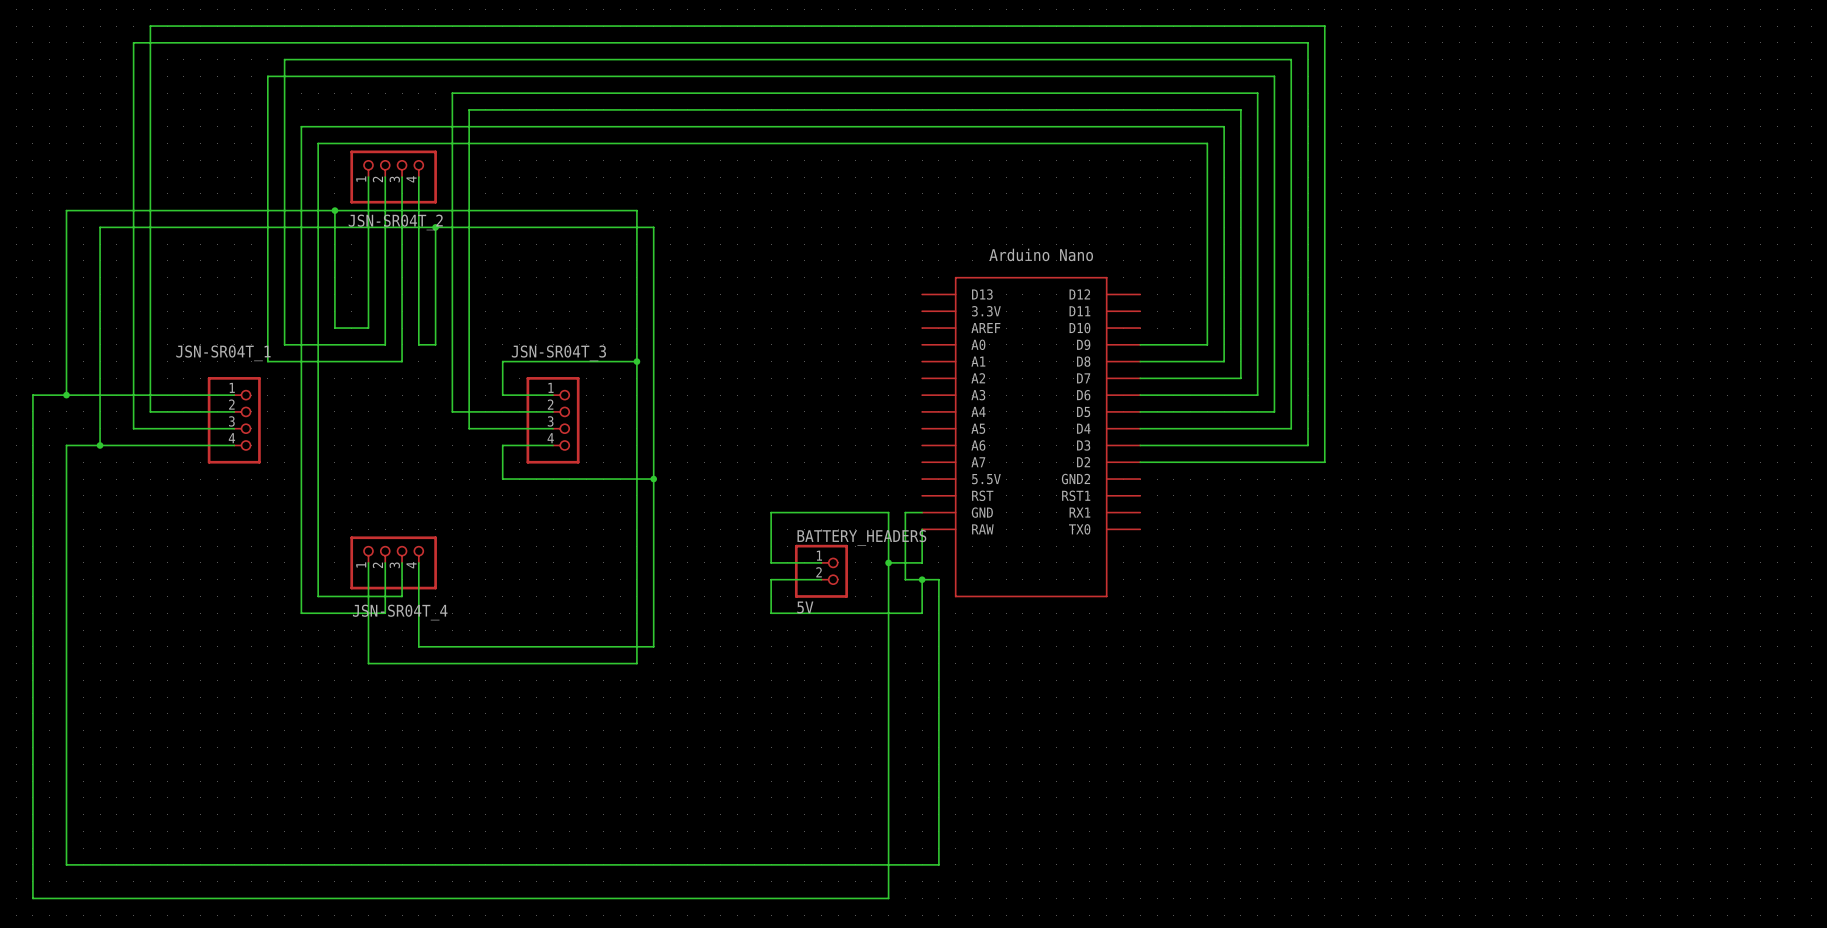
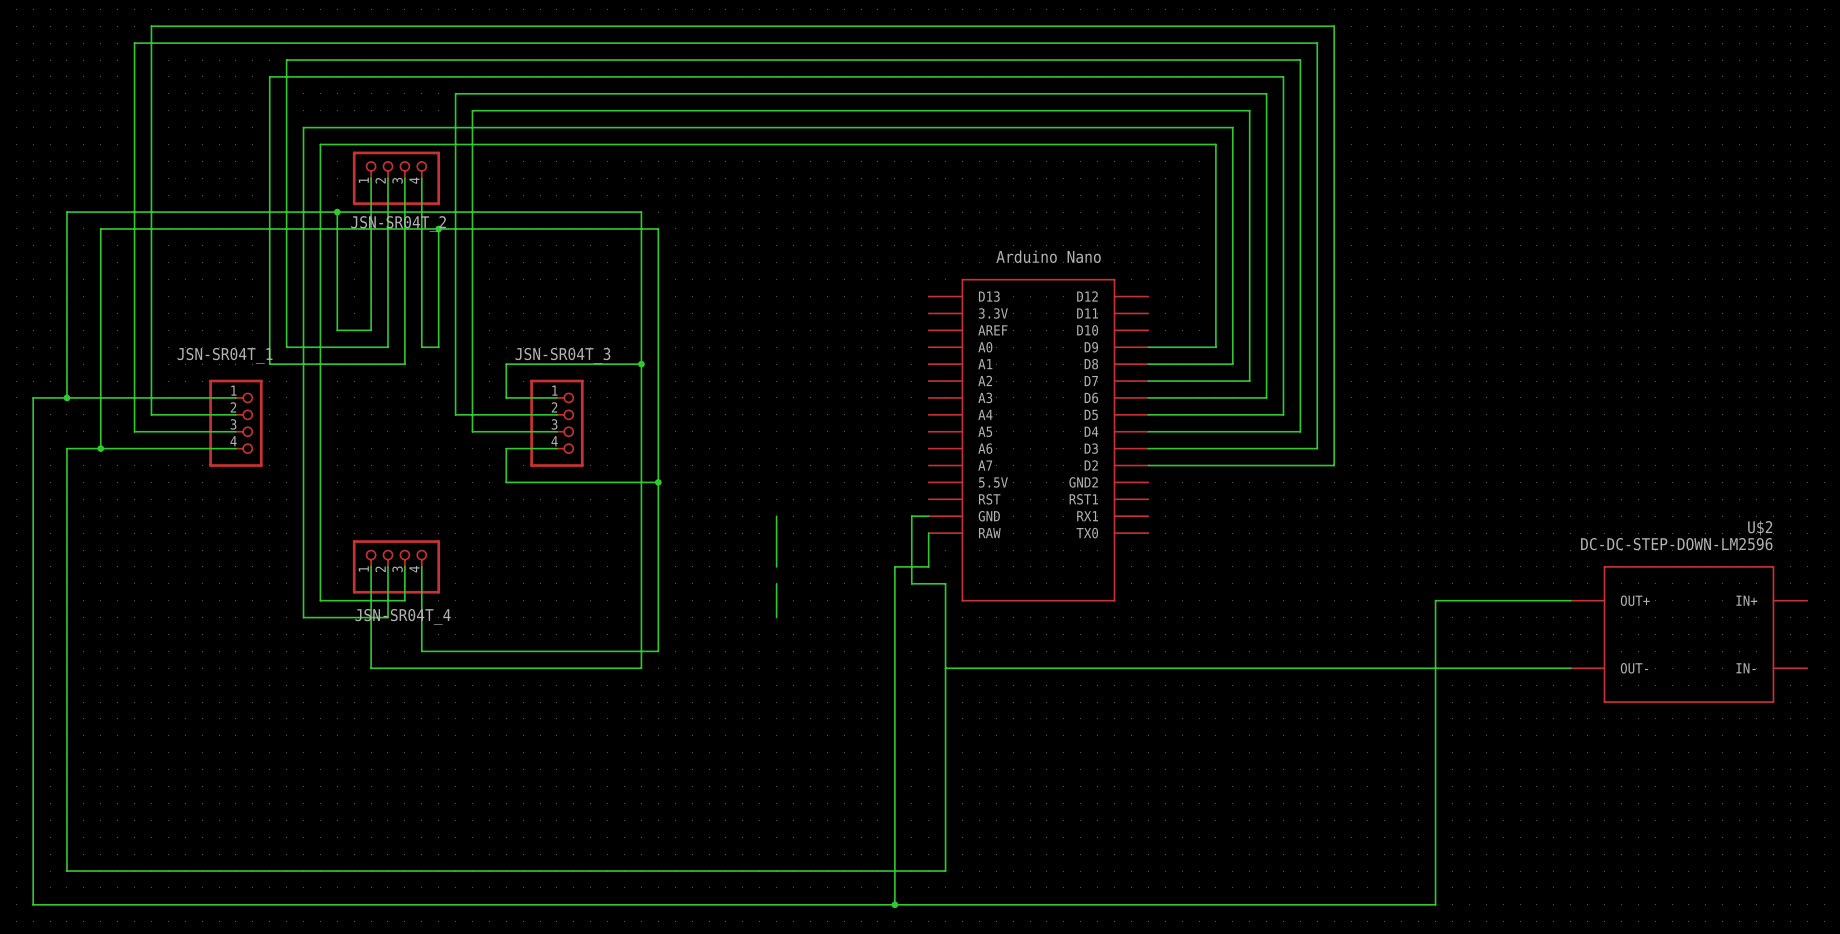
wire: (771, 512) (888, 512) (888, 562) -> none
wire: (771, 562) (821, 562) -> none
junction: (888, 562) -> none
BATTERY_HEADERS: 5V (821, 571) -> none
wire: (771, 579) (821, 579) -> none
wire: (922, 579) (922, 613) (771, 613) -> none
junction: (922, 579) -> none
wire: none -> (1570, 600) (1435, 600) (1435, 904) (894, 904)
U$2: none -> DC-DC-STEP-DOWN-LM2596 (1688, 634)
wire: none -> (945, 668) (1570, 668)
junction: none -> (894, 904)

